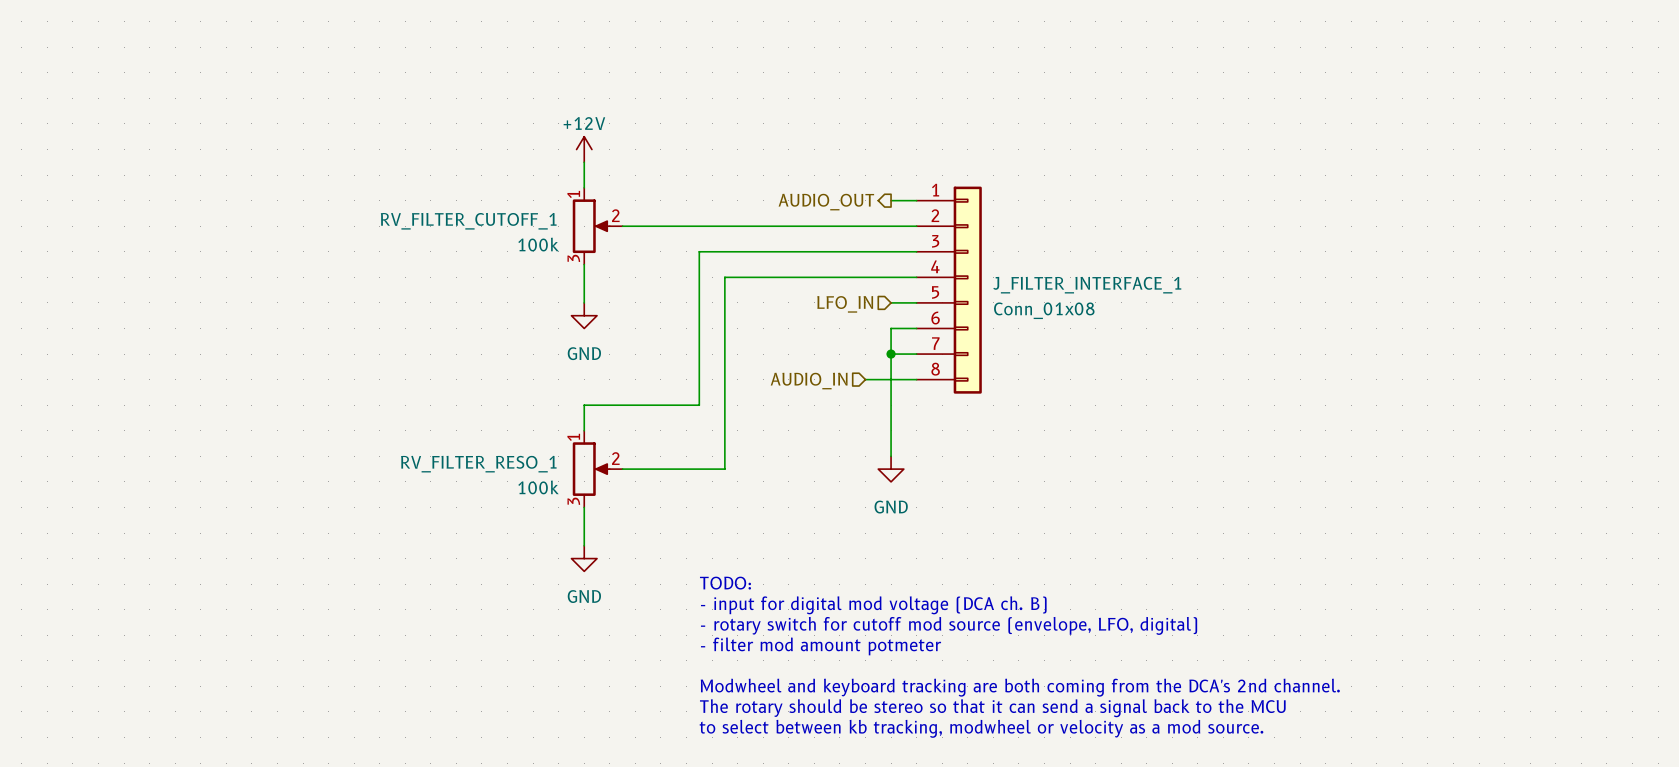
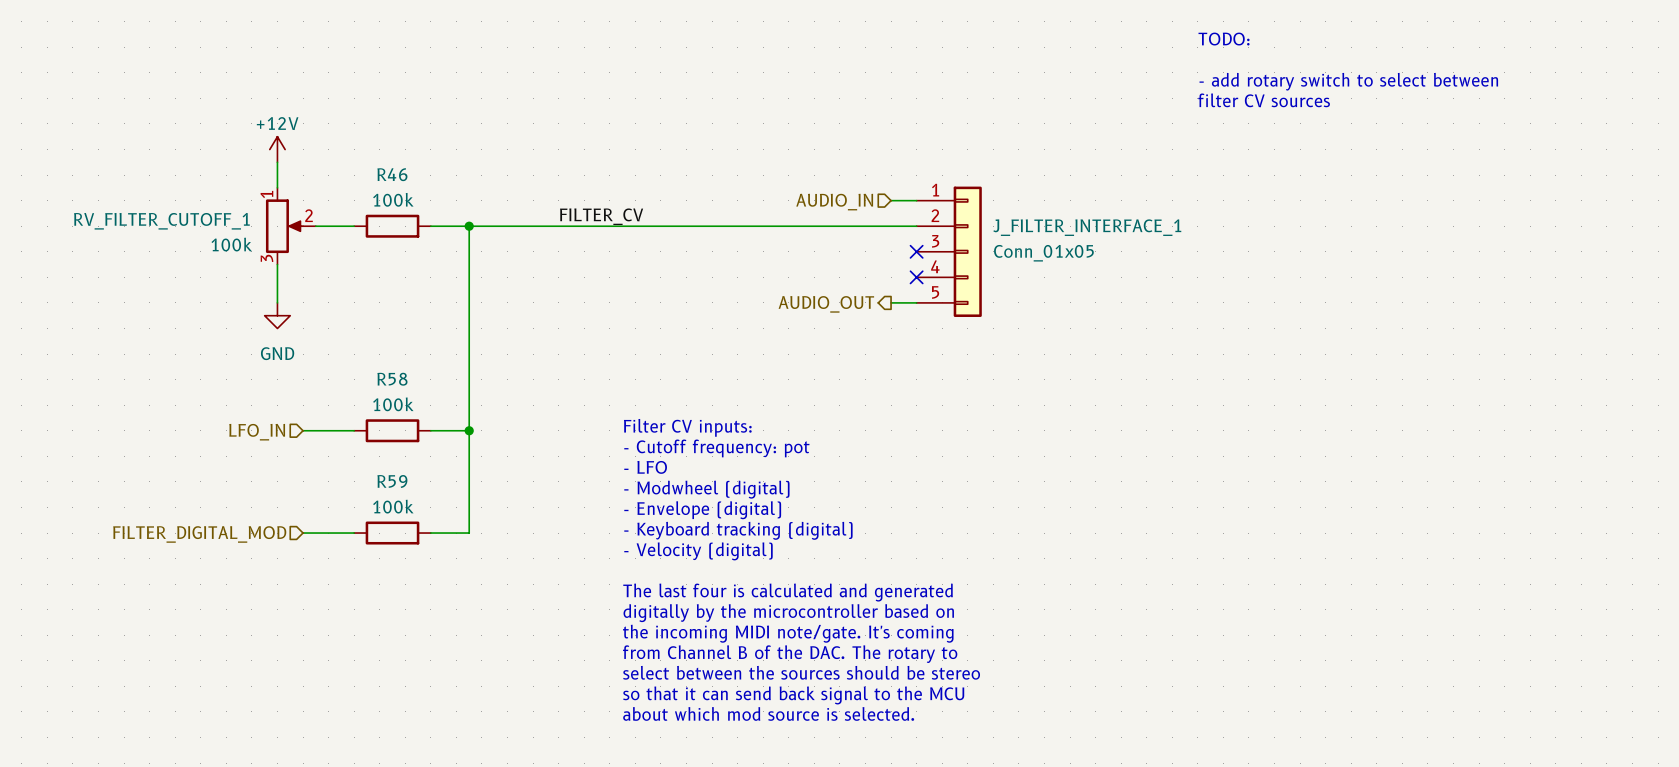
text: none -> TODO: (1224, 39)
text: none -> - add rotary switch to select between (1348, 81)
text: none -> filter CV sources (1264, 100)
power symbol: none -> +12V (277, 149)
power symbol: +12V (584, 149) -> none
wire: none -> (277, 162) (277, 187)
wire: (584, 162) (584, 187) -> none
J_FILTER_INTERFACE_1 symbol: [916, 186, 982, 394] -> [916, 186, 982, 317]
hierarchical label shape: output (826, 202) -> input (834, 202)
hierarchical label: AUDIO_OUT (826, 202) -> AUDIO_IN (834, 202)
label: none -> FILTER_CV (601, 216)
wire: none -> (315, 226) (354, 226)
R46: none -> 100k (392, 226)
wire: none -> (430, 226) (622, 226)
wire: none -> (469, 226) (469, 533) (430, 533)
junction: none -> (469, 226)
RV_FILTER_CUTOFF_1 position: (597, 226) -> (290, 226)
wire: (916, 251) (699, 251) (699, 405) (584, 405) (584, 430) -> none
no-connect mark: none -> (916, 251)
wire: none -> (277, 264) (277, 302)
wire: (584, 264) (584, 302) -> none
wire: (916, 277) (724, 277) (724, 469) (622, 469) -> none
no-connect mark: none -> (916, 277)
hierarchical label shape: input (845, 304) -> output (826, 304)
hierarchical label: LFO_IN (845, 304) -> AUDIO_OUT (826, 304)
J_FILTER_INTERFACE_1 value: Conn_01x08 (1044, 310) -> Conn_01x05 (1043, 253)
power symbol: none -> GND (277, 315)
power symbol: GND (584, 315) -> none
wire: (916, 328) (891, 328) (891, 456) -> none
wire: (891, 354) (916, 354) -> none
junction: (891, 354) -> none
wire: (865, 379) (916, 379) -> none
hierarchical label: AUDIO_IN (809, 381) -> none
text: none -> Filter CV inputs: (687, 427)
wire: none -> (303, 430) (354, 430)
R58: none -> 100k (392, 430)
wire: none -> (430, 430) (469, 430)
junction: none -> (469, 430)
hierarchical label: none -> LFO_IN (257, 432)
text: none -> - Cutoff frequency: pot (716, 448)
text: none -> - LFO (645, 467)
RV_FILTER_RESO_1: 100k (597, 469) -> none
power symbol: GND (891, 469) -> none
text: none -> - Modwheel (digital) (706, 489)
wire: (584, 507) (584, 545) -> none
text: none -> - Envelope (digital) (702, 510)
text: none -> - Keyboard tracking (digital) (738, 530)
wire: none -> (303, 533) (354, 533)
R59: none -> 100k (392, 533)
hierarchical label: none -> FILTER_DIGITAL_MOD (199, 534)
text: none -> - Velocity (digital) (698, 551)
power symbol: GND (584, 558) -> none
text: TODO: (725, 583) -> none
text: none -> The last four is calculated and generated (788, 592)
text: - input for digital mod voltage (DCA ch. B) (873, 605) -> none
text: none -> digitally by the microcontroller based on (788, 613)
text: - rotary switch for cutoff mod source (envelope, LFO, digital) (949, 625) -> none
text: none -> the incoming MIDI note/gate. It's coming (788, 633)
text: - filter mod amount potmeter (821, 646) -> none
text: none -> from Channel B of the DAC. The rotary to (790, 654)
text: none -> select between the sources should be stereo (801, 672)
text: Modwheel and keyboard tracking are both coming from the DCA's 2nd channel. (1020, 687) -> none
text: The rotary should be stereo so that it can send a signal back to the MCU (992, 708) -> so that it can send back signal to the MCU (793, 695)
text: none -> about which mod source is selected. (768, 713)
text: to select between kb tracking, modwheel or velocity as a mod source. (981, 728) -> none

